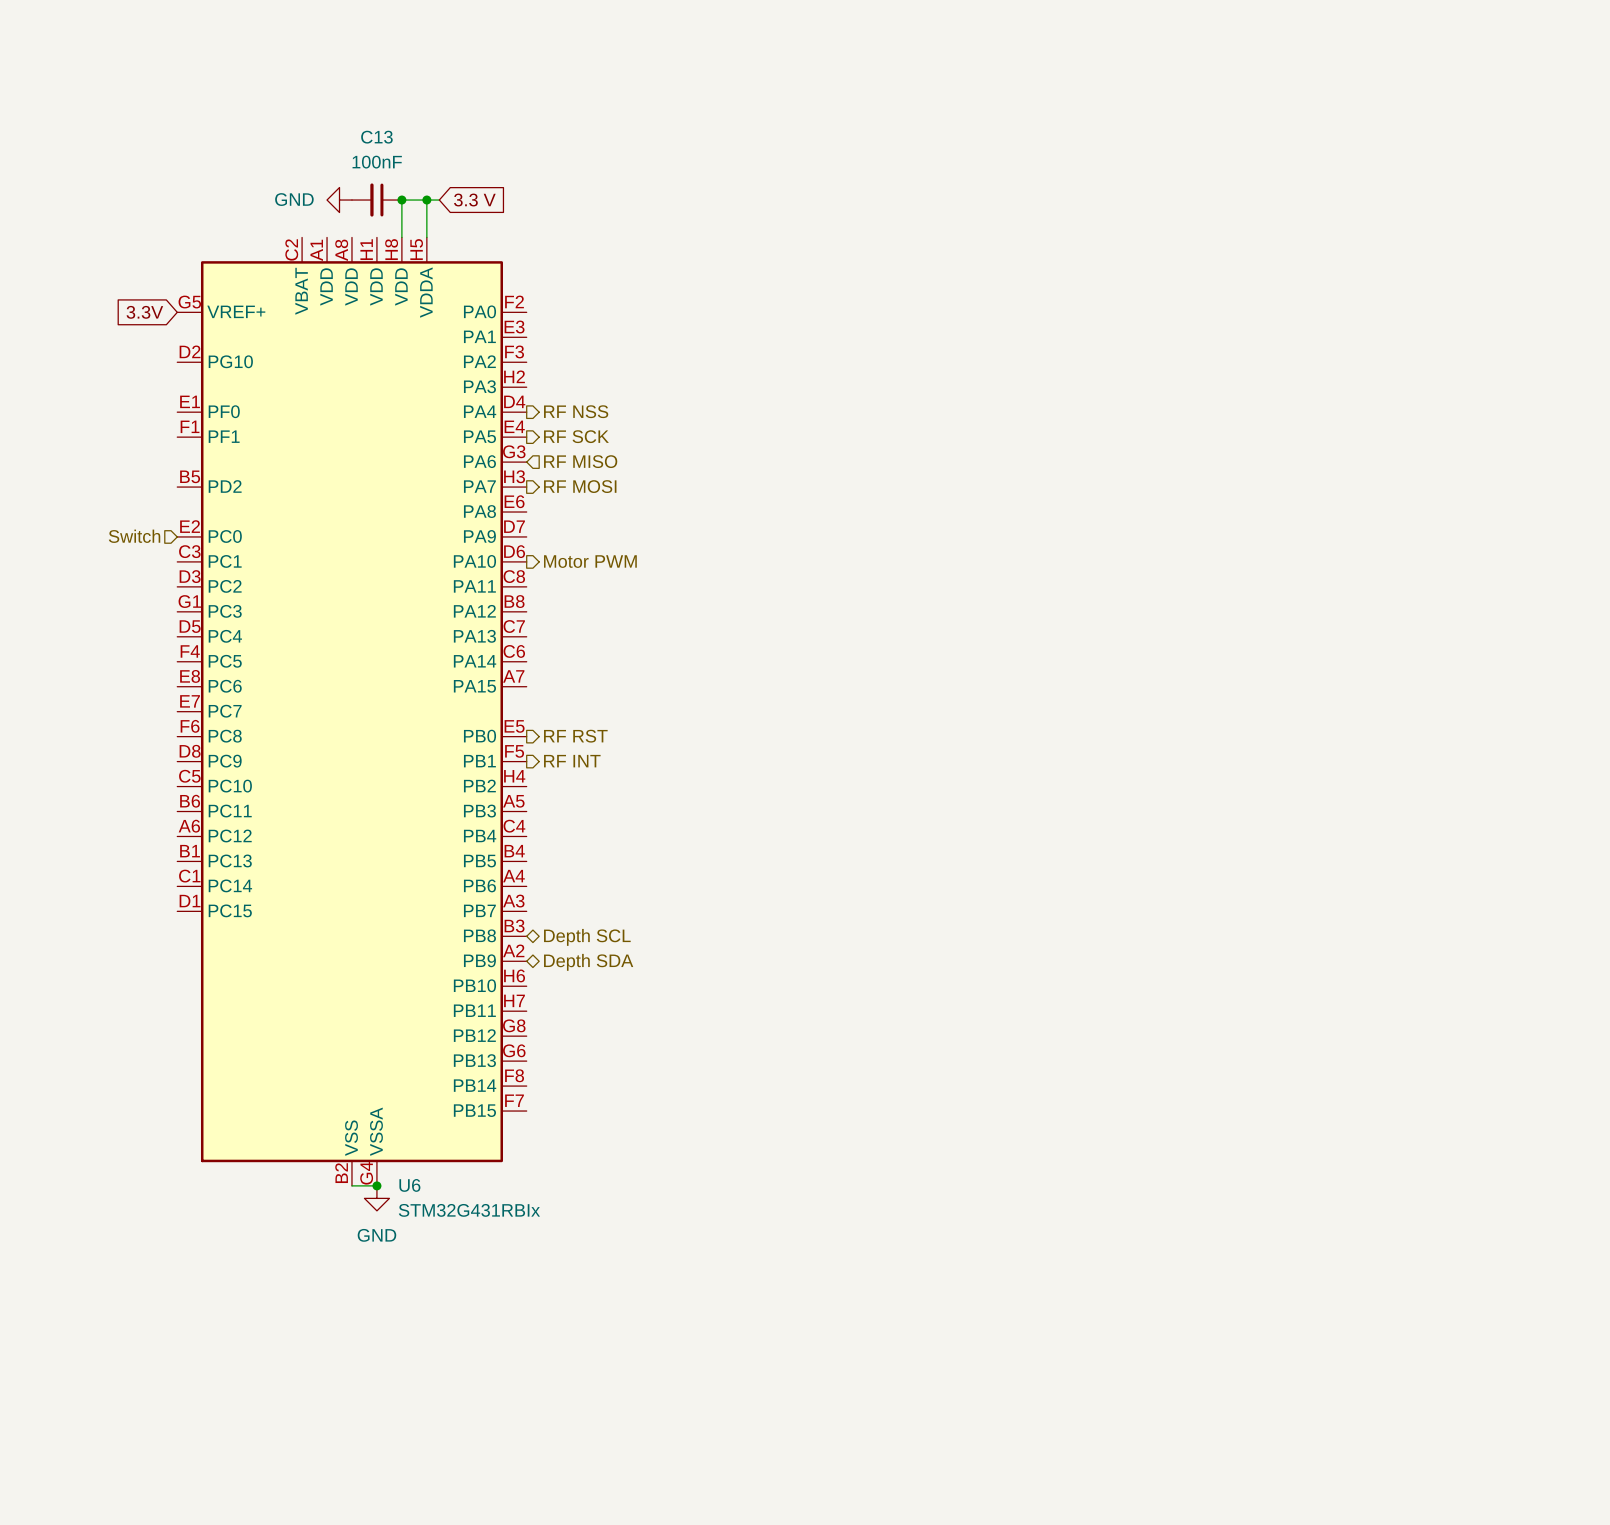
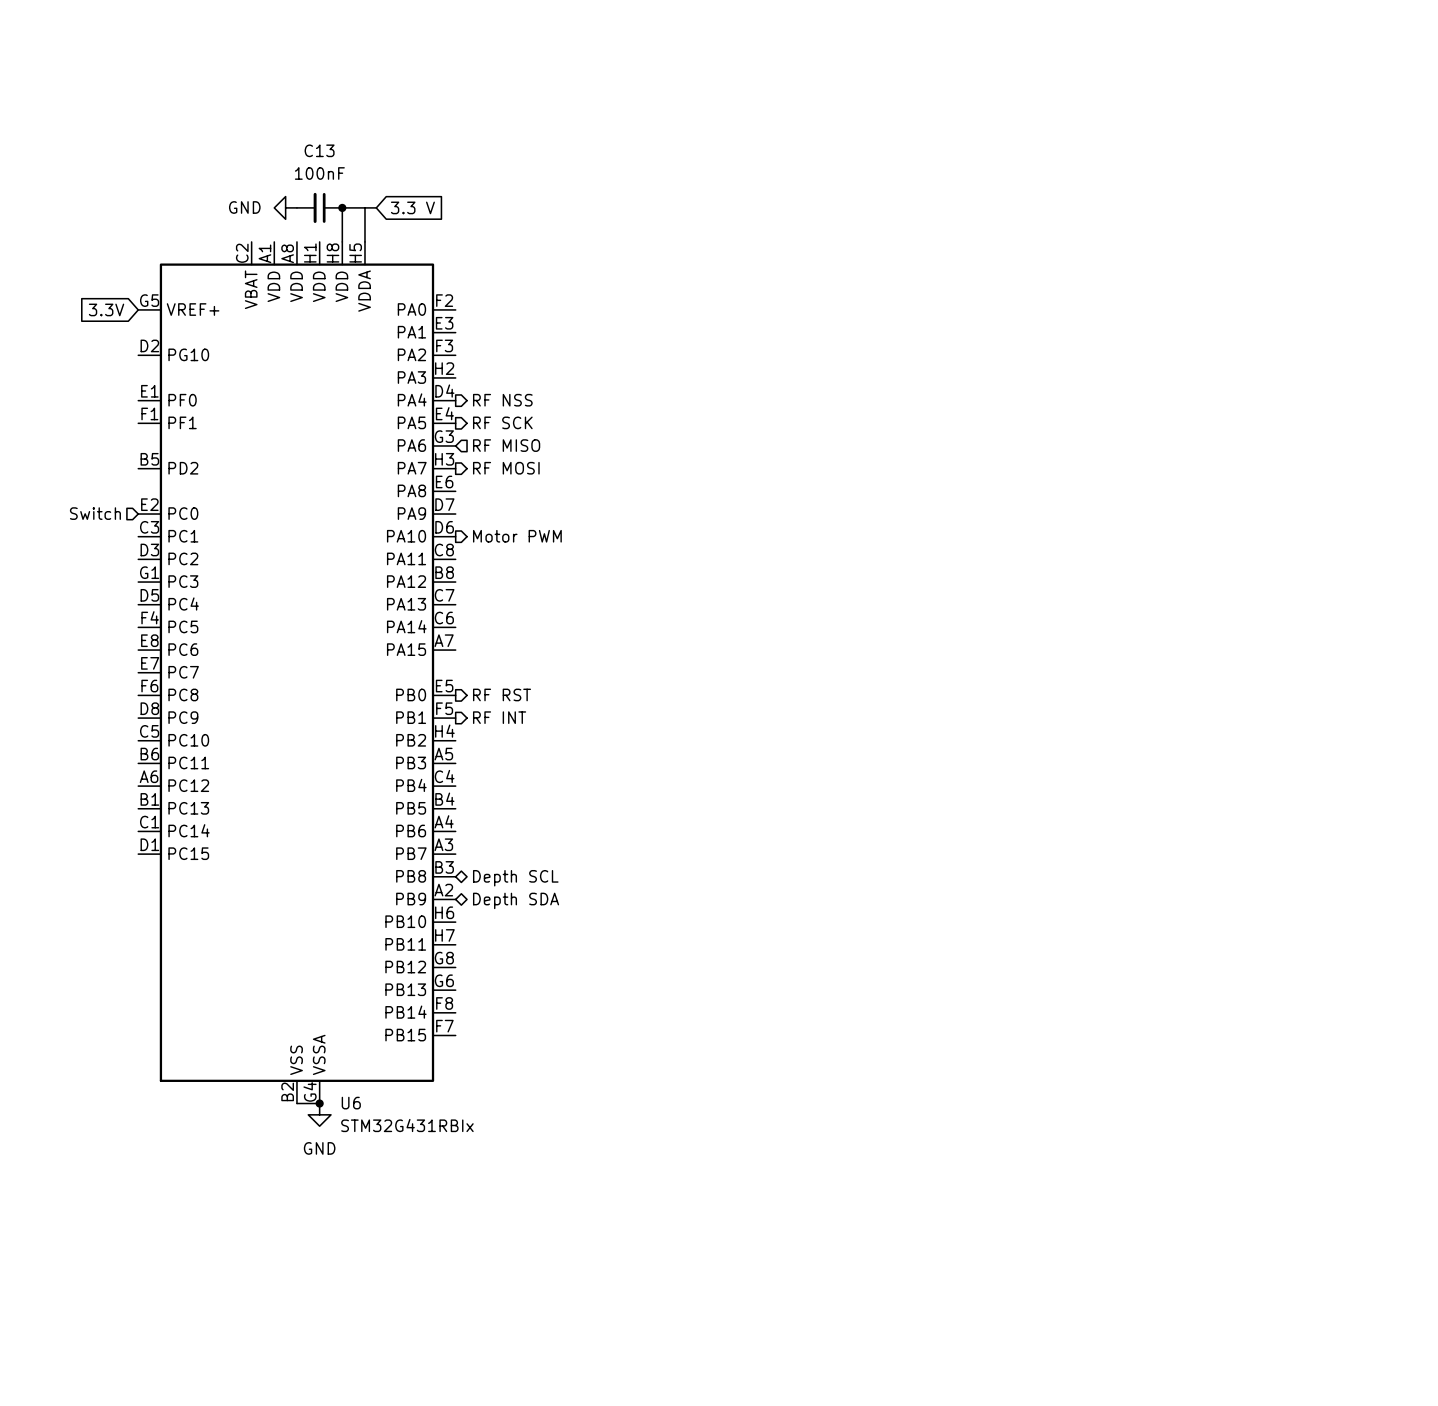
junction: (426, 200) -> none

